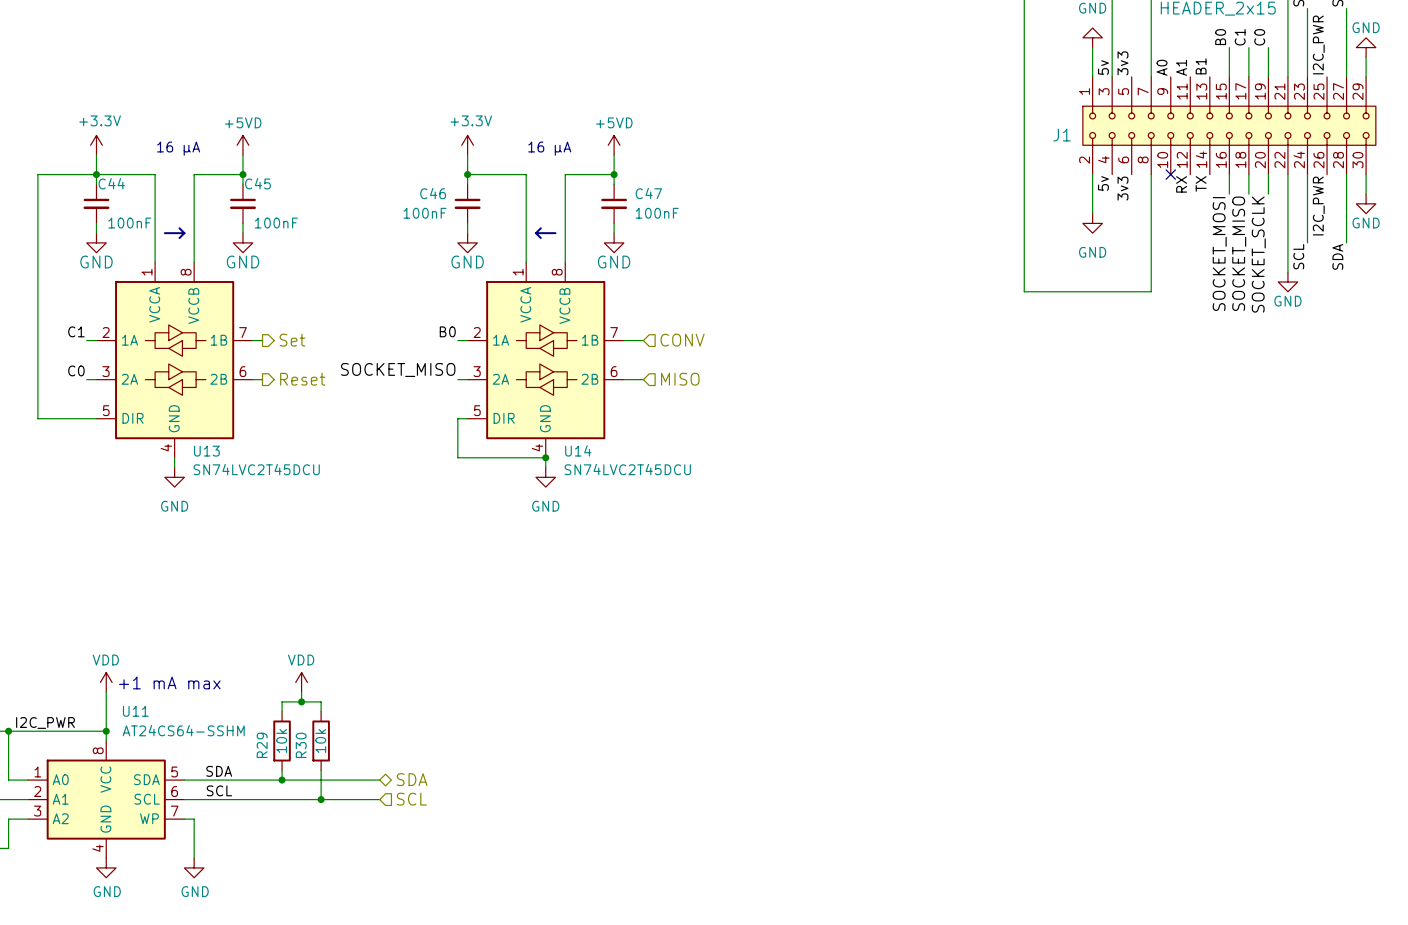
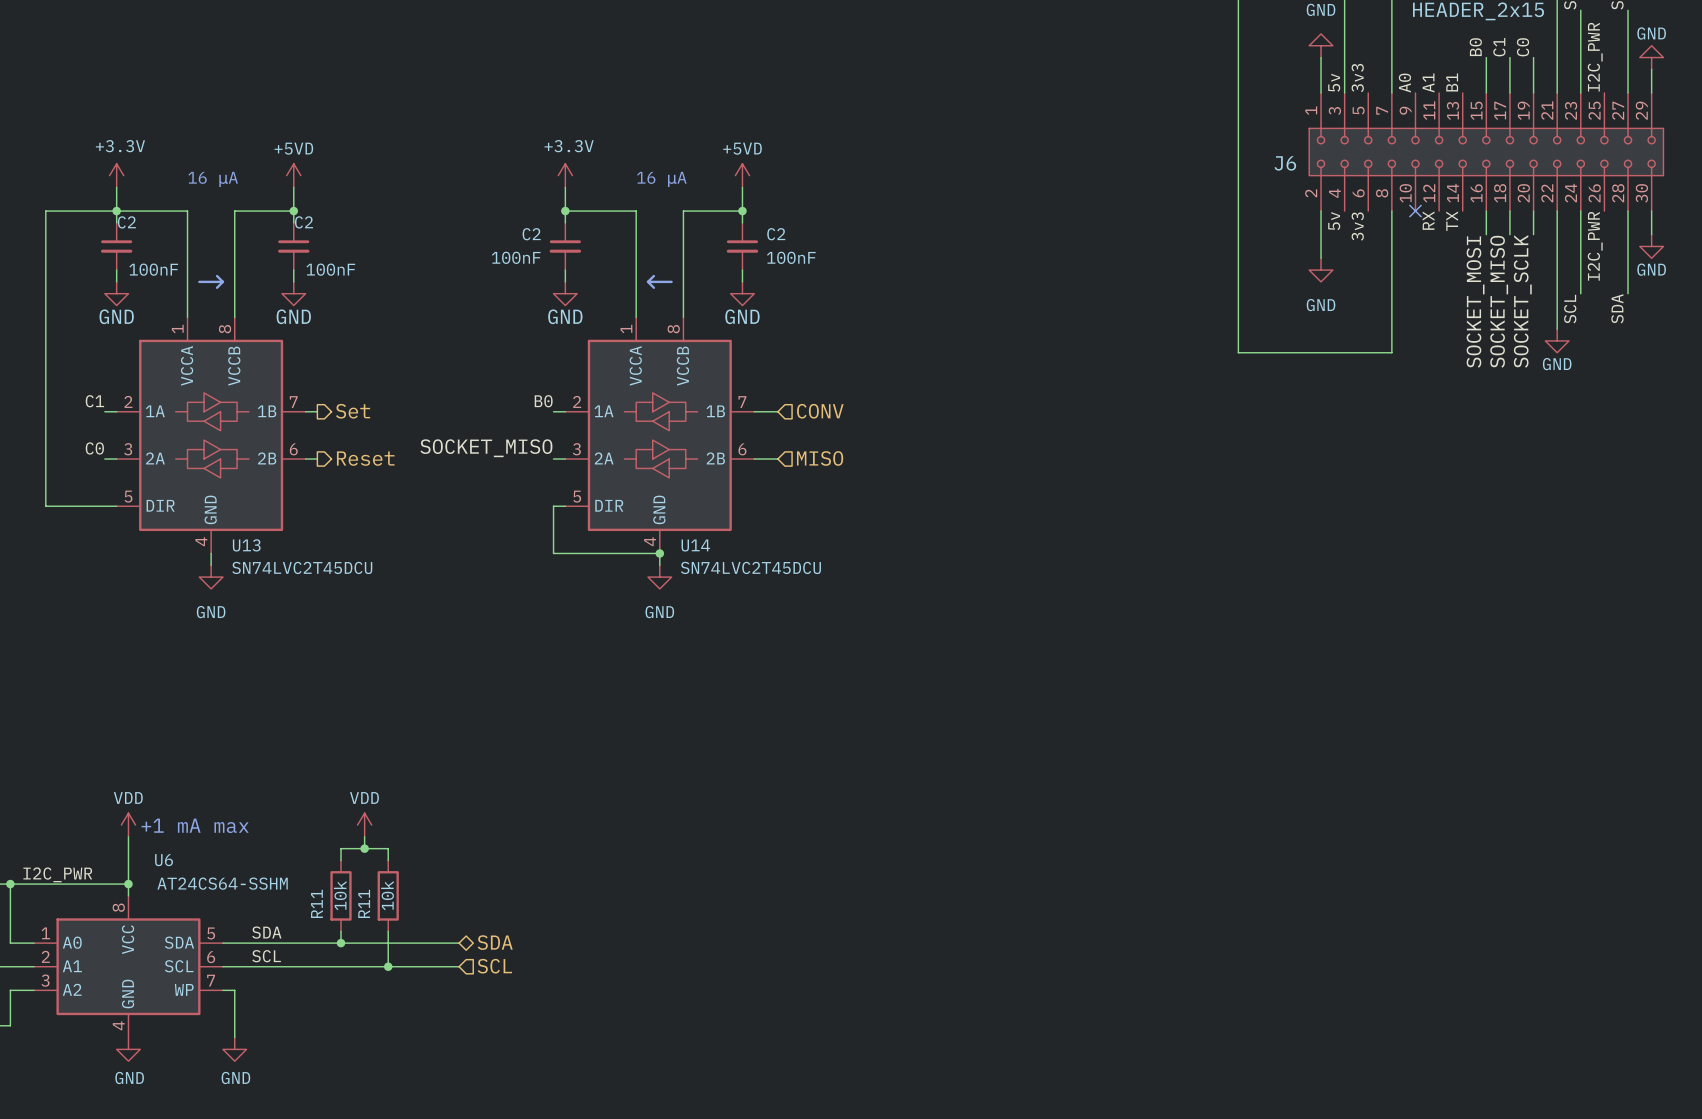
J1 name: J1 (1062, 135) -> J6 (1285, 163)
C44 name: C44 (111, 183) -> C2 (126, 222)
C45 name: C45 (257, 183) -> C2 (303, 222)
C46 name: C46 (433, 193) -> C2 (531, 234)
C47 name: C47 (648, 193) -> C2 (776, 234)
U11 name: U11 (135, 711) -> U6 (164, 860)
R29 name: R29 (262, 745) -> R11 (316, 903)
R30 name: R30 (301, 745) -> R11 (364, 903)

